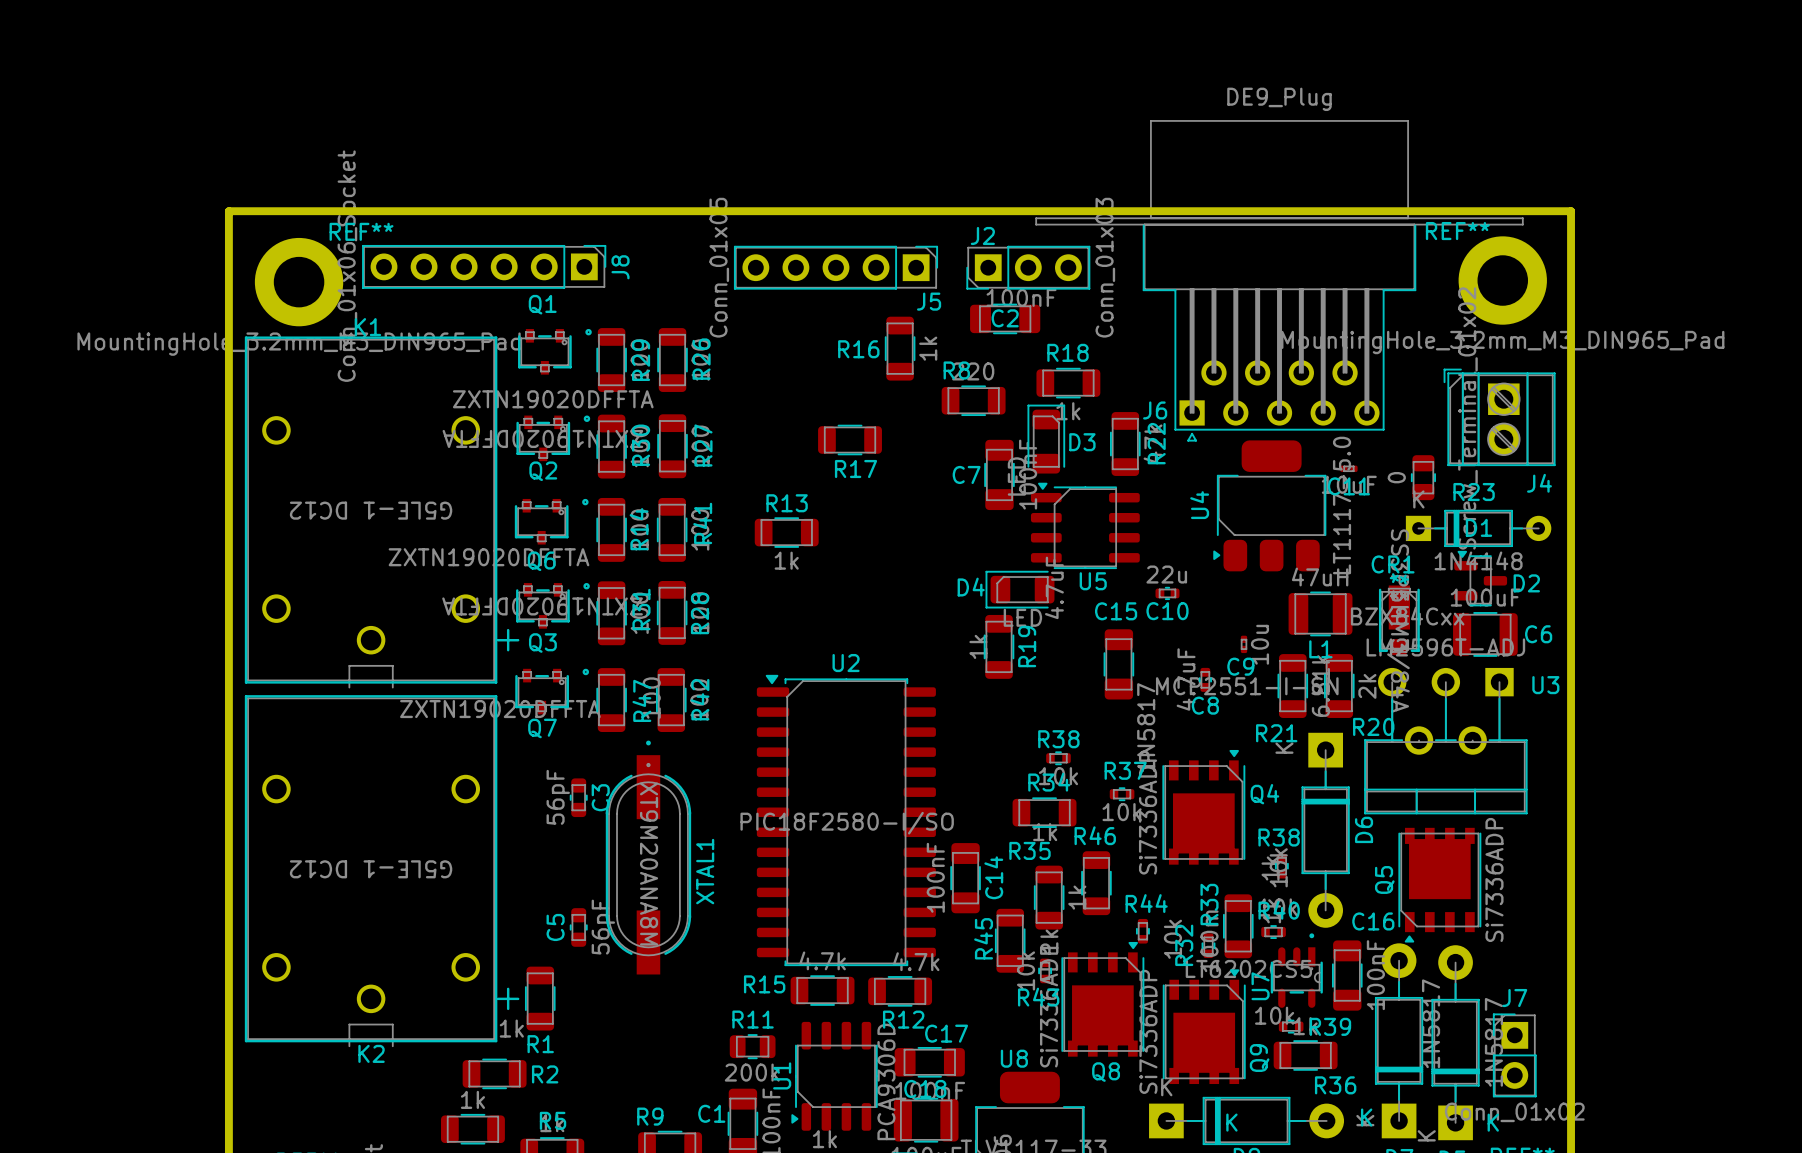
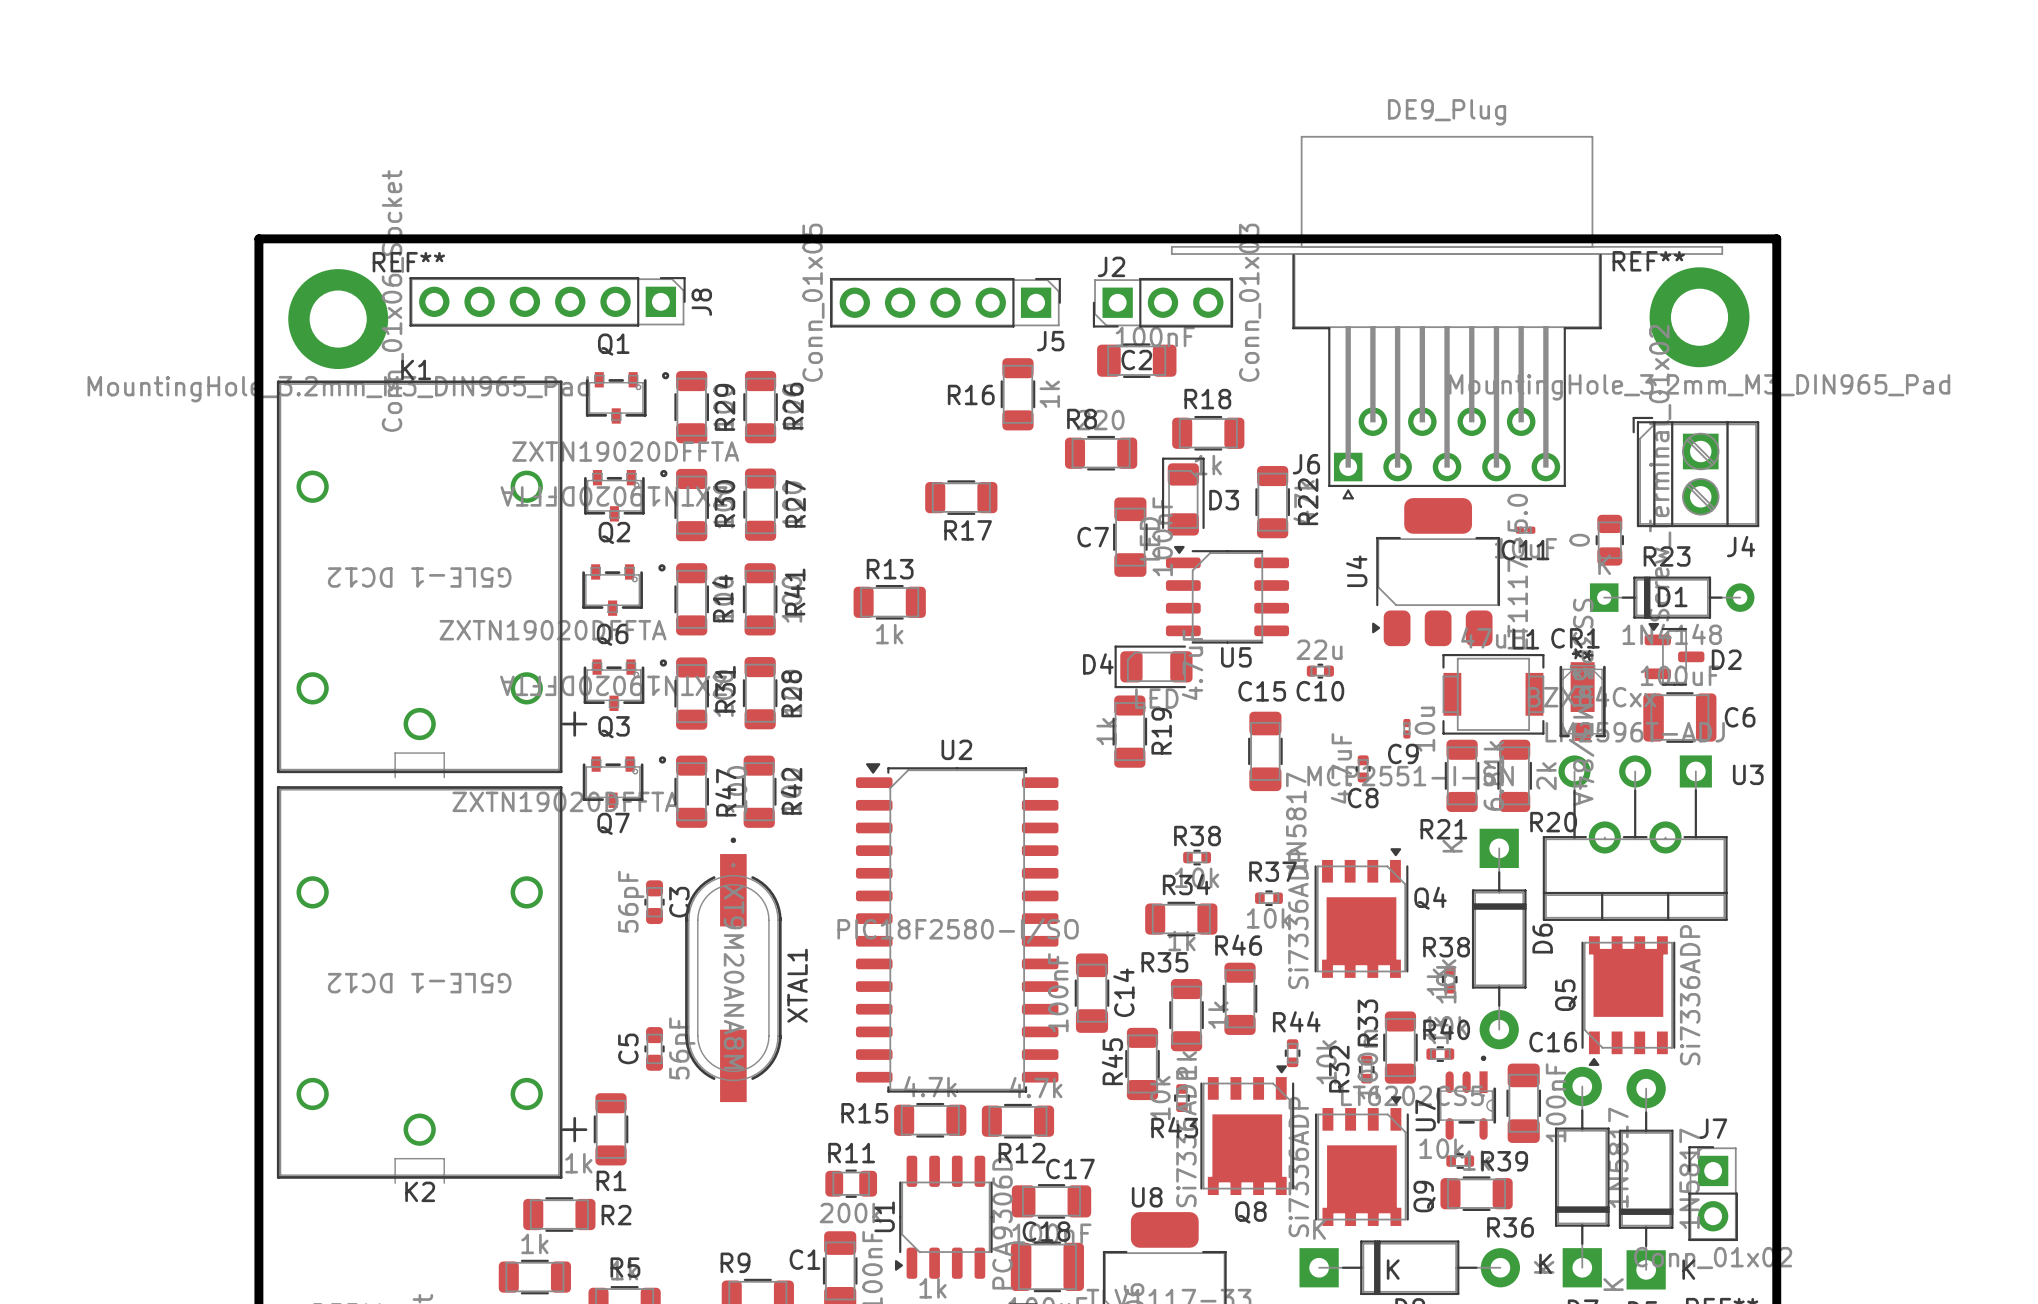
L1 footprint: [1288, 591, 1353, 637] -> [1442, 654, 1545, 735]
L1 name position: L1 (1320, 649) -> L1 (1525, 639)

